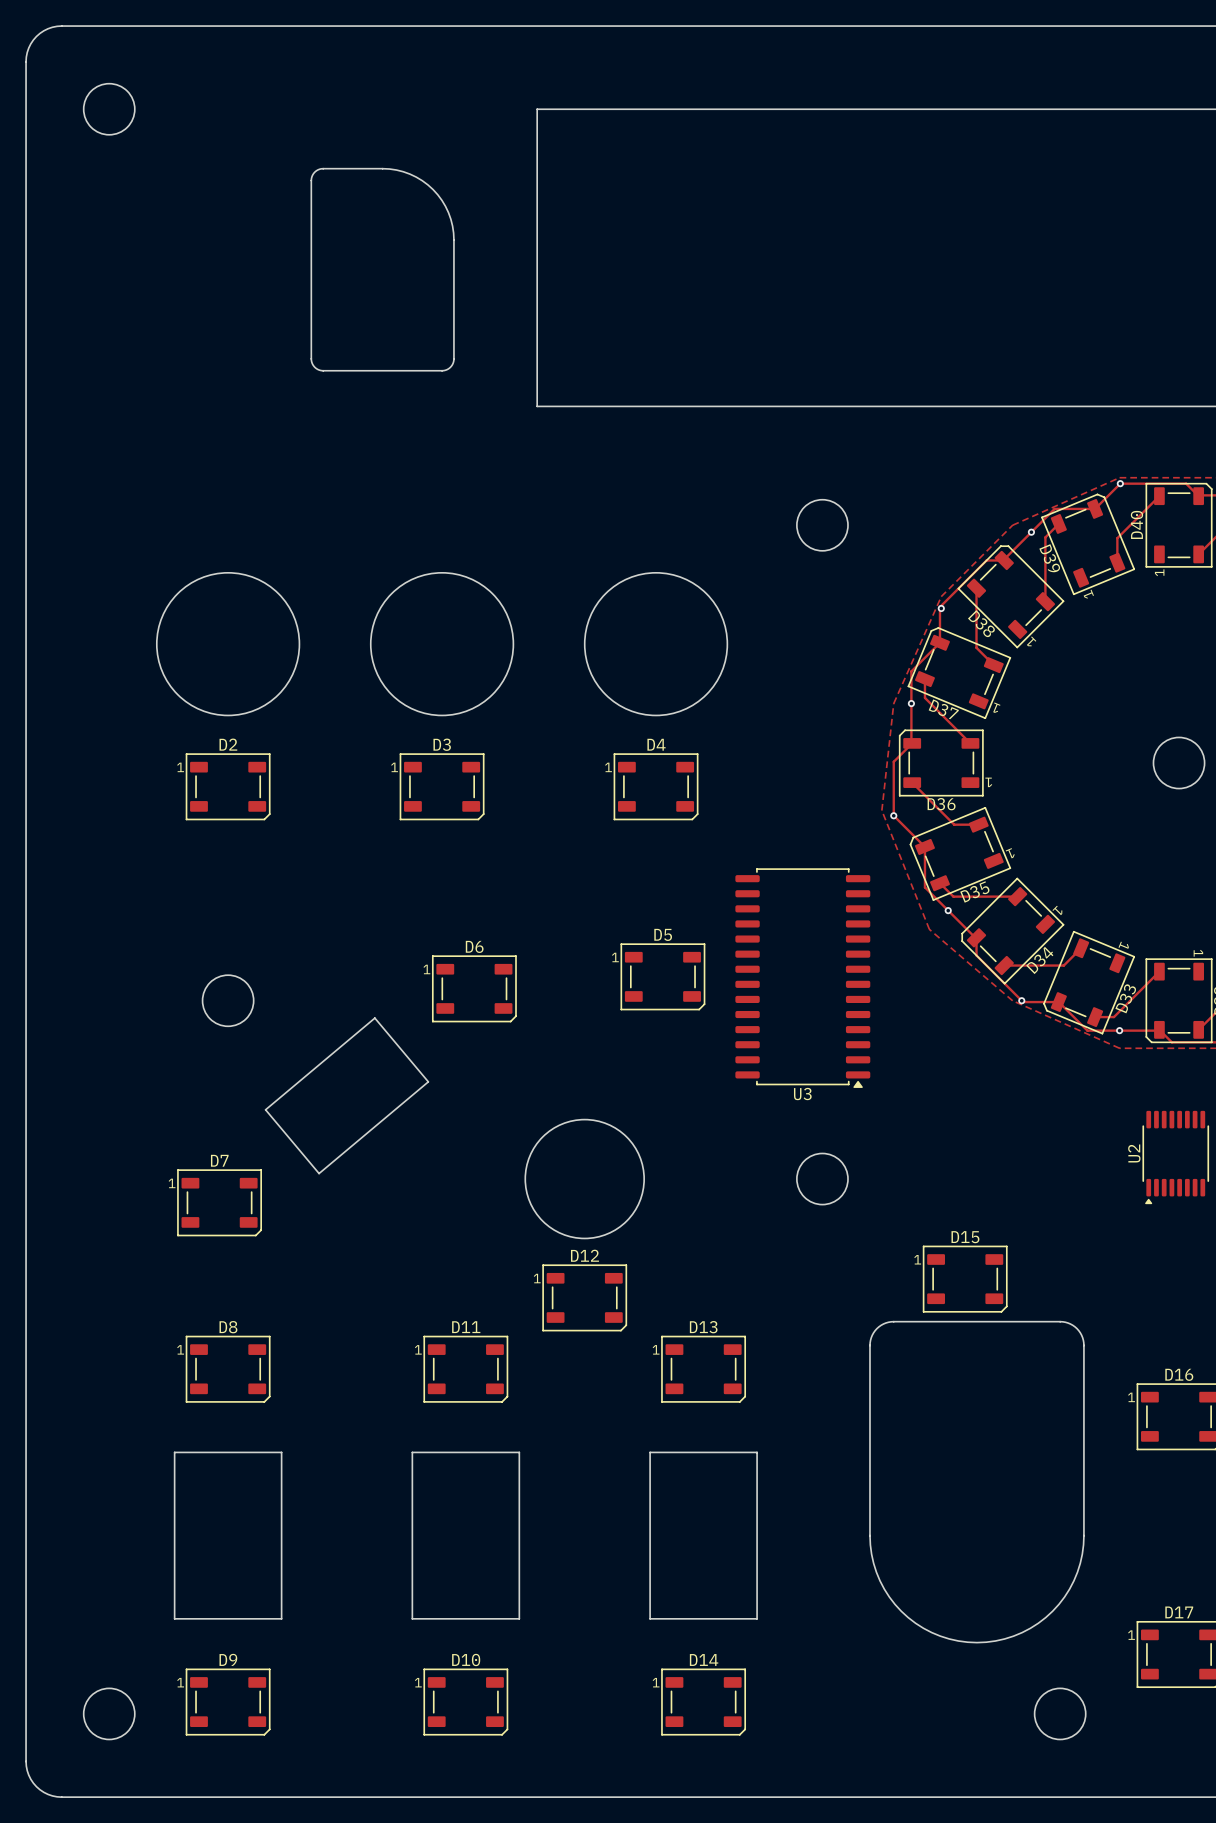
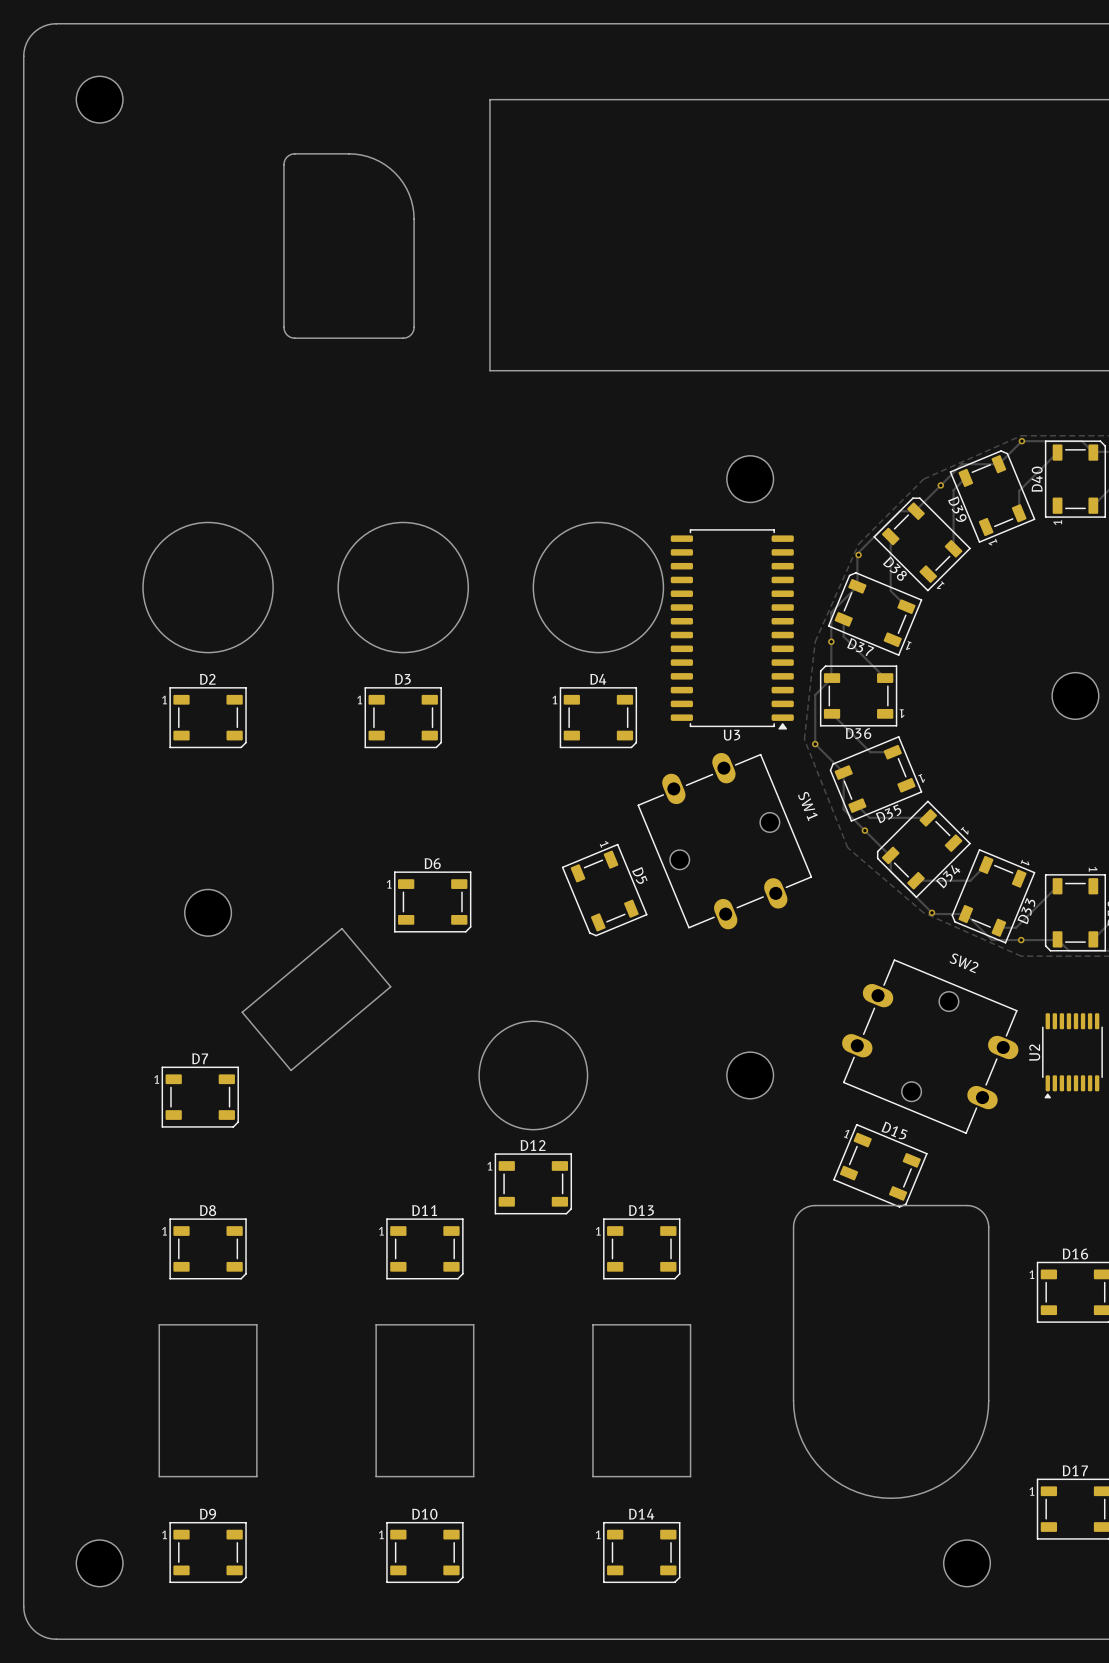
SW1: none -> (724, 841)
D5 rotation: 0° (662, 976) -> 67.5° clockwise (604, 890)
U3 position: (802, 978) -> (732, 629)
SW2: none -> (930, 1046)
D15 rotation: 0° (965, 1279) -> 22.5° clockwise (880, 1165)

